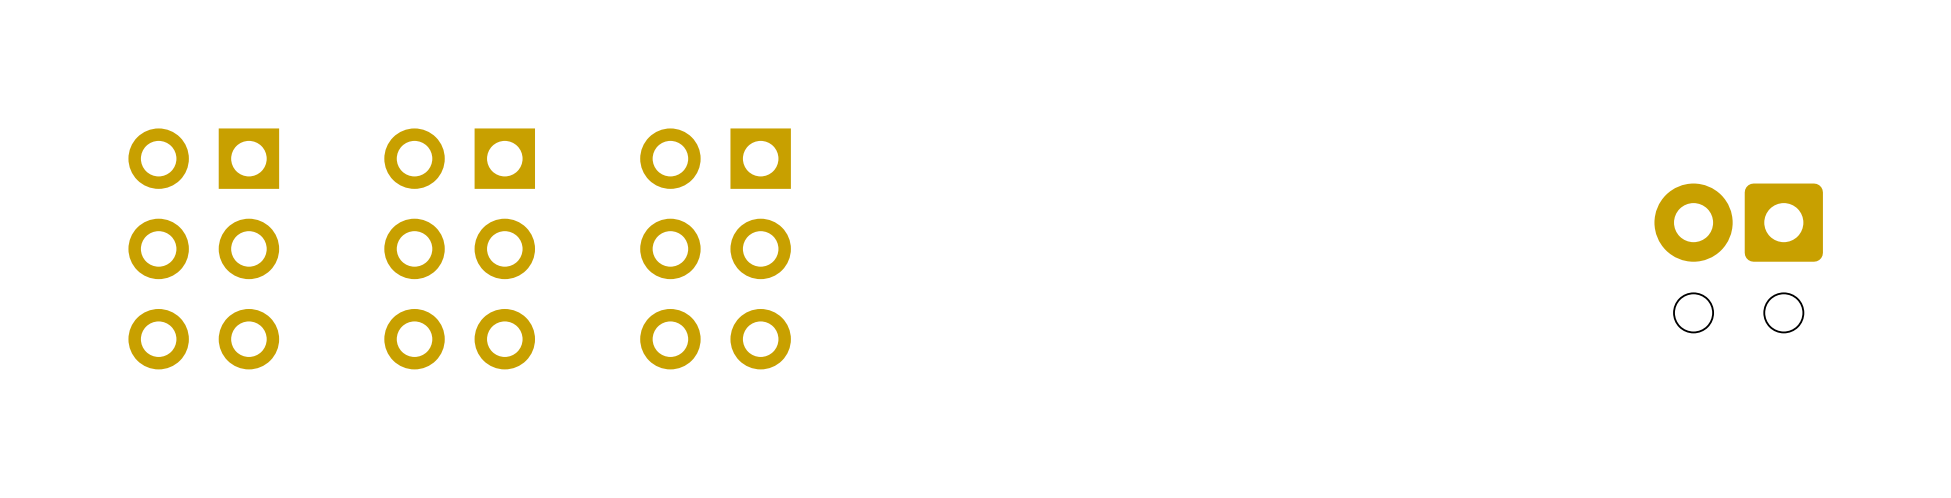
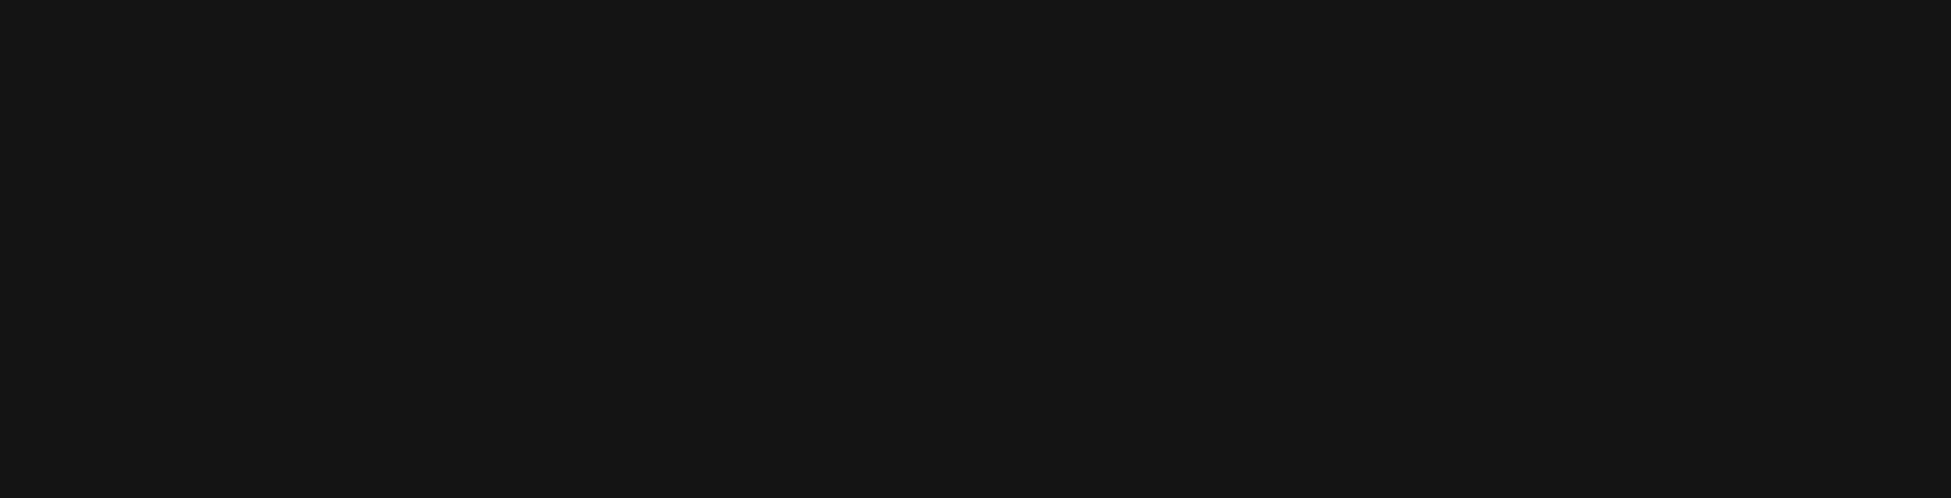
part: (203, 248) -> none
part: (459, 248) -> none
part: (715, 248) -> none
part: (1738, 257) -> none

